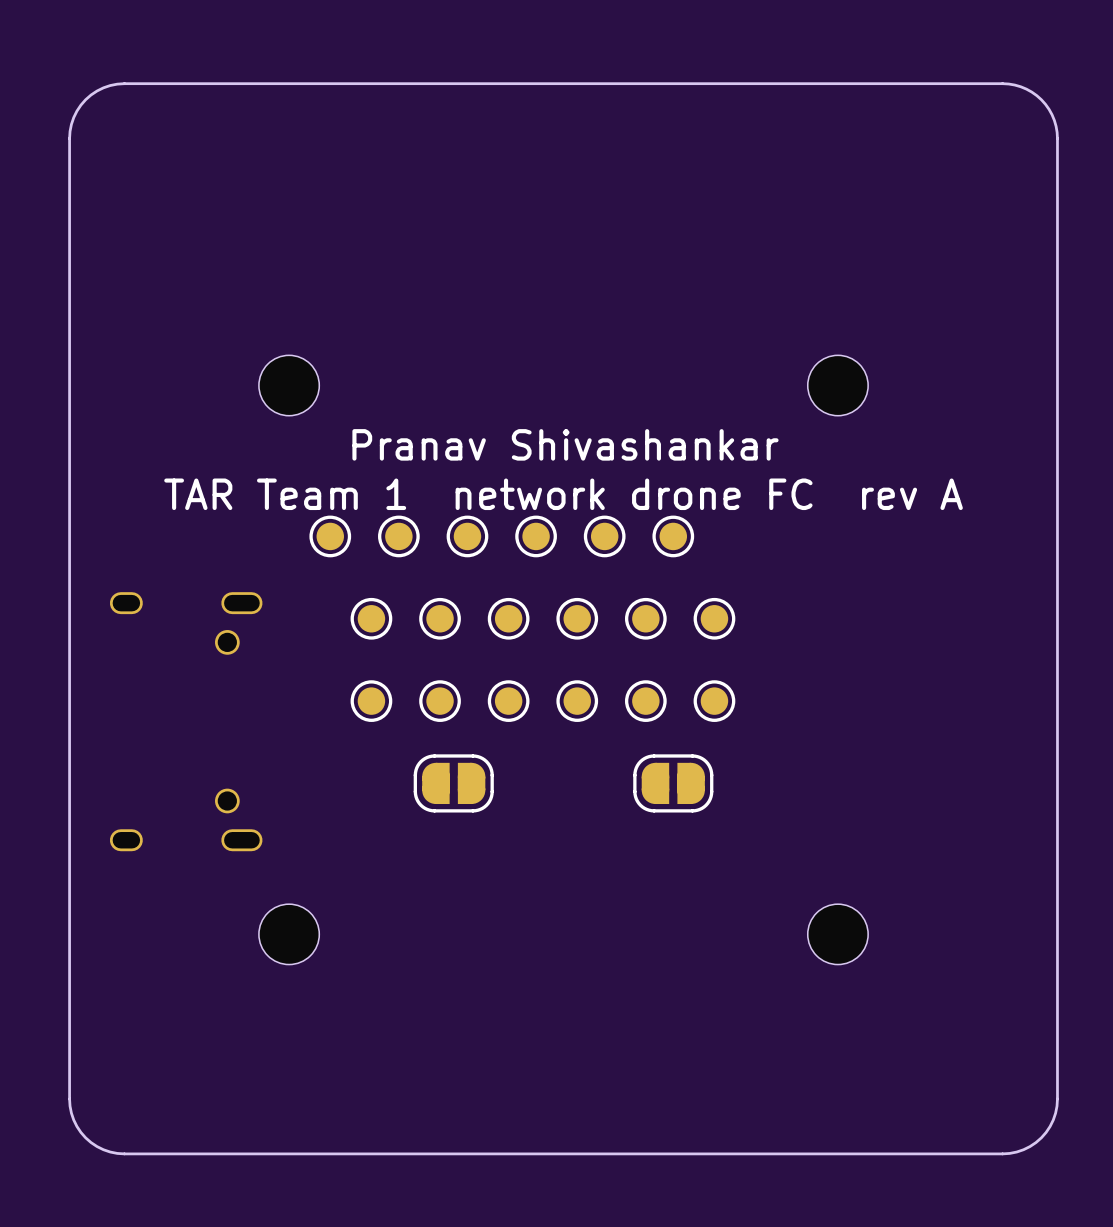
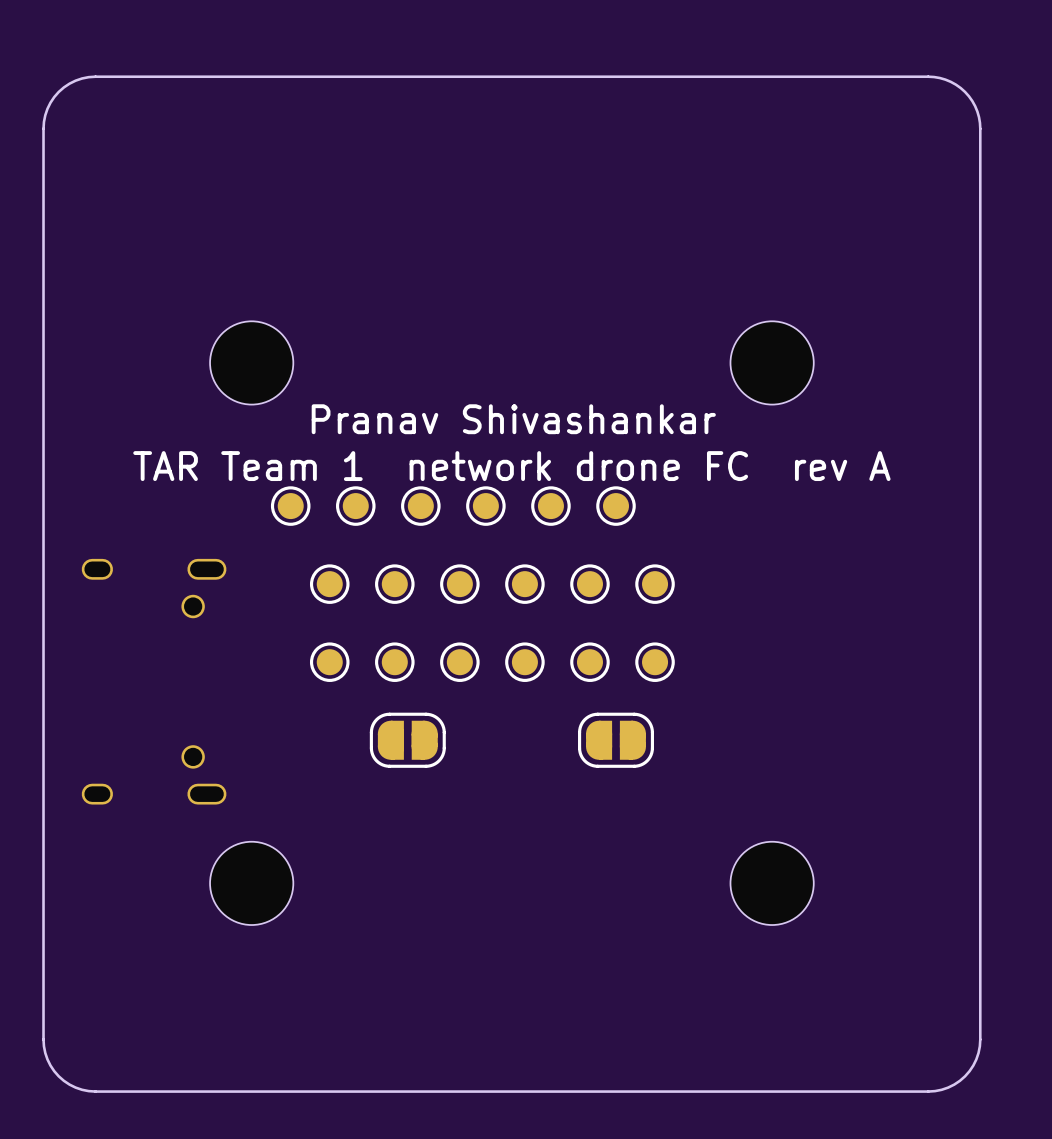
part footprint: [258, 355, 320, 416] -> [210, 321, 294, 405]
part footprint: [807, 355, 869, 416] -> [730, 321, 814, 405]
part footprint: [258, 904, 320, 965] -> [210, 841, 294, 926]
part footprint: [807, 904, 869, 965] -> [730, 841, 814, 926]

